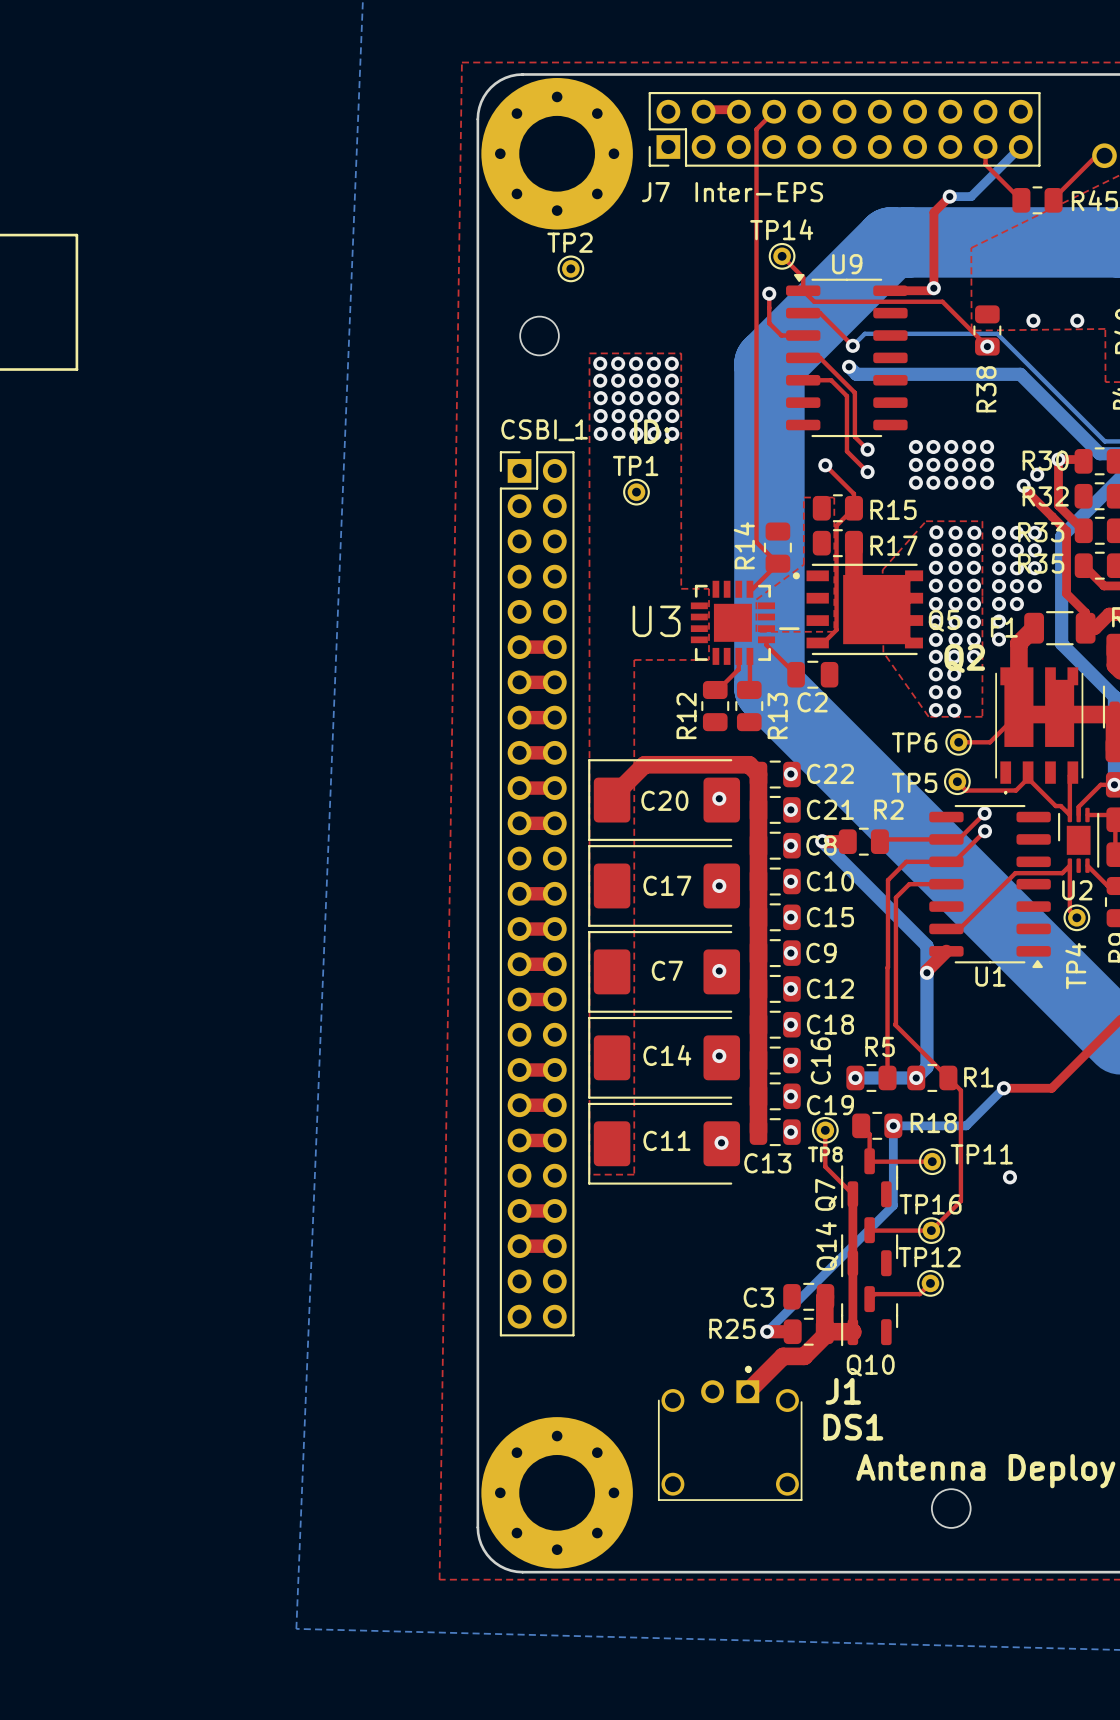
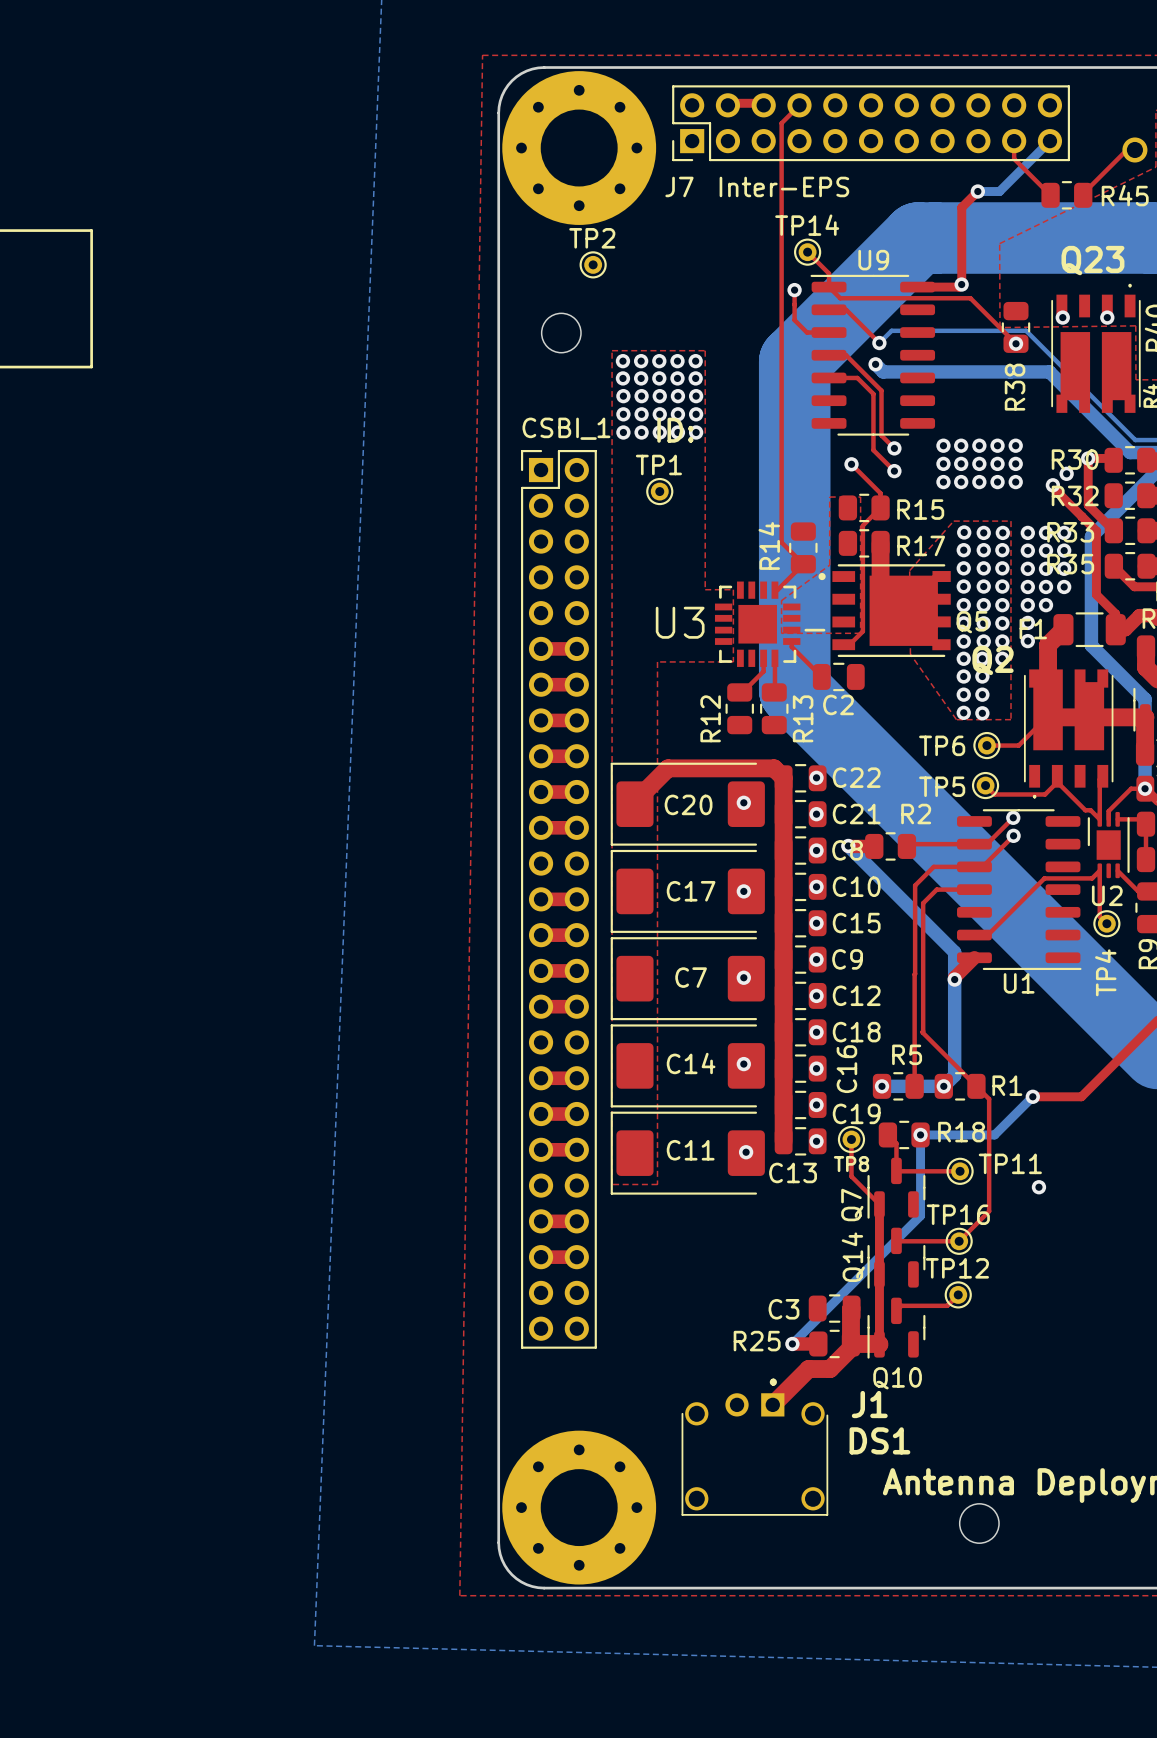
U9 footprint: [786, 274, 908, 438] -> [810, 274, 936, 436]
Q23: none -> (1095, 348)
U1 footprint: [929, 804, 1051, 969] -> [957, 809, 1082, 971]

